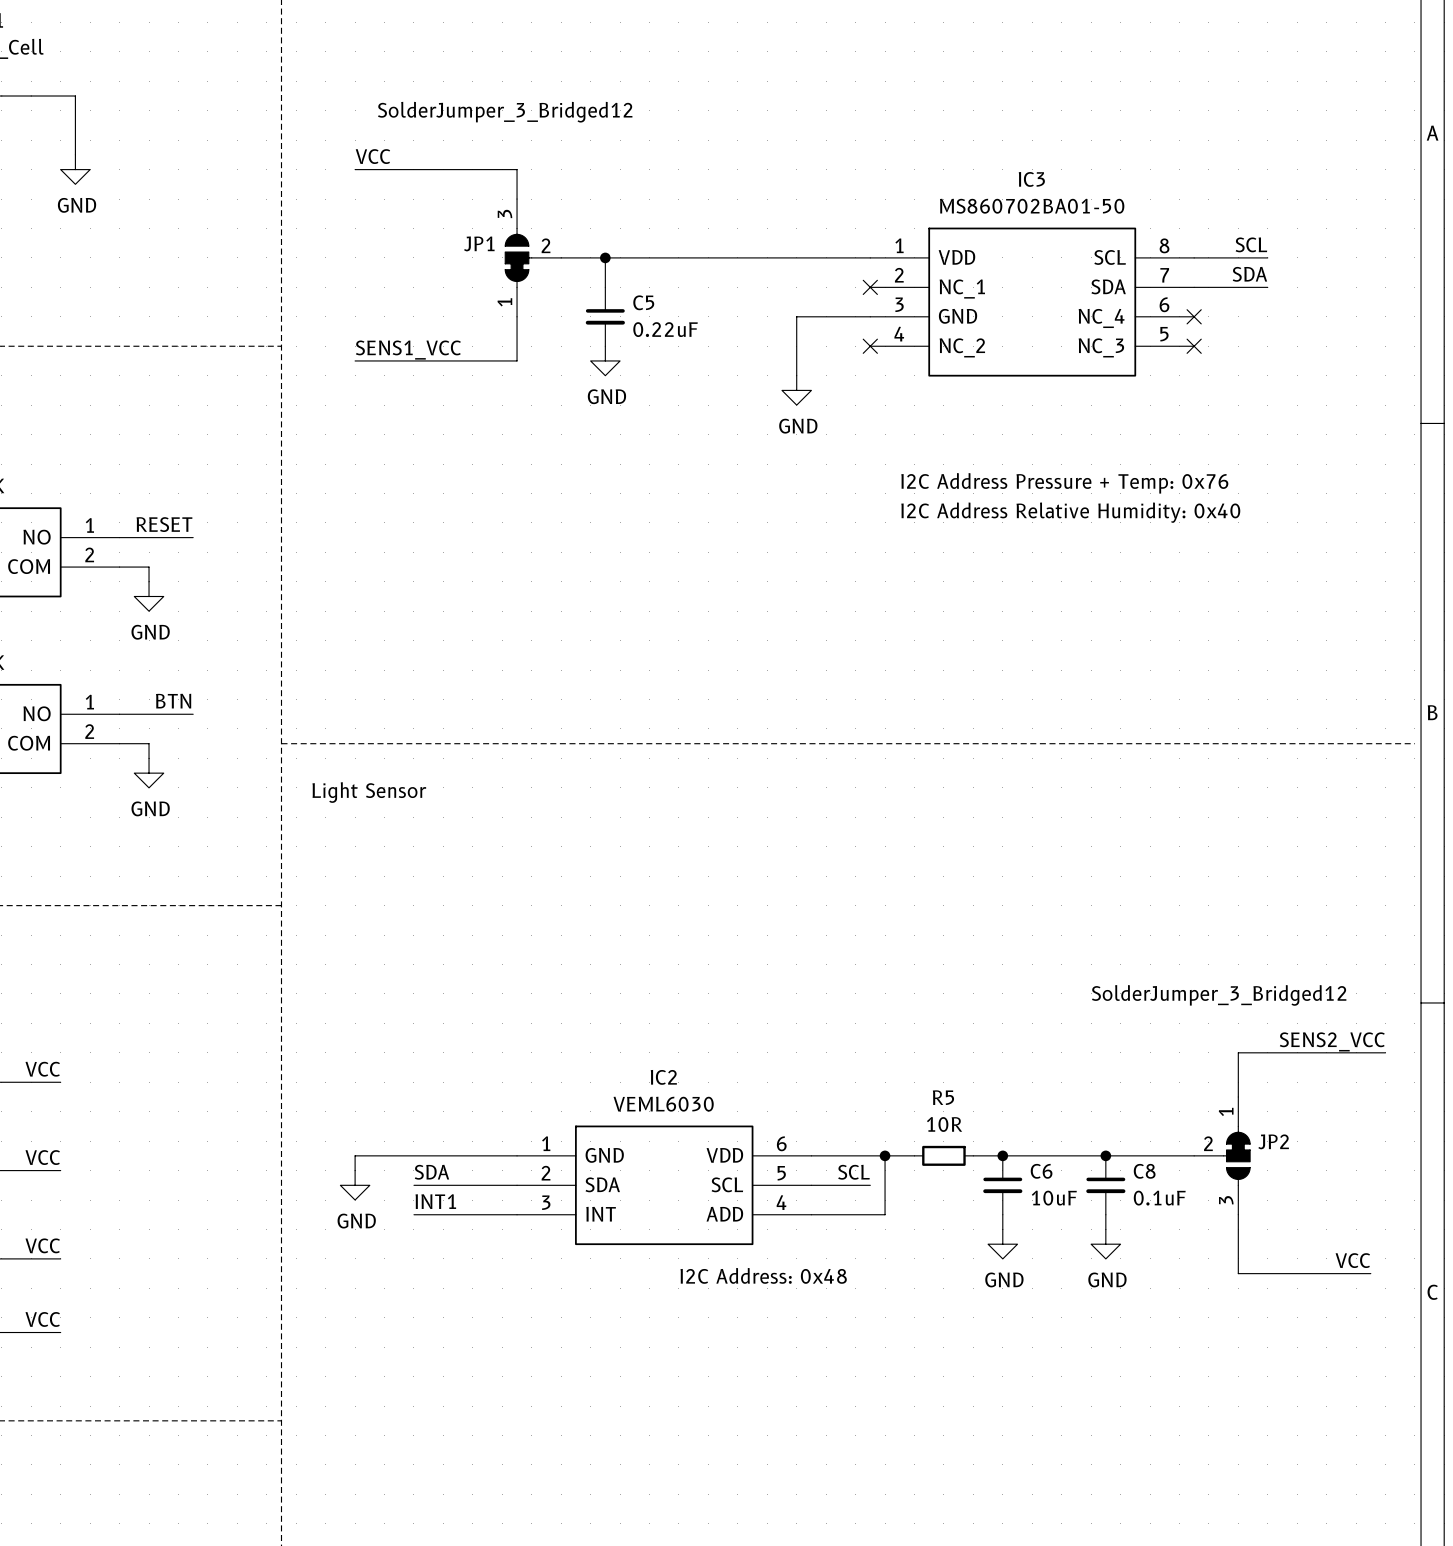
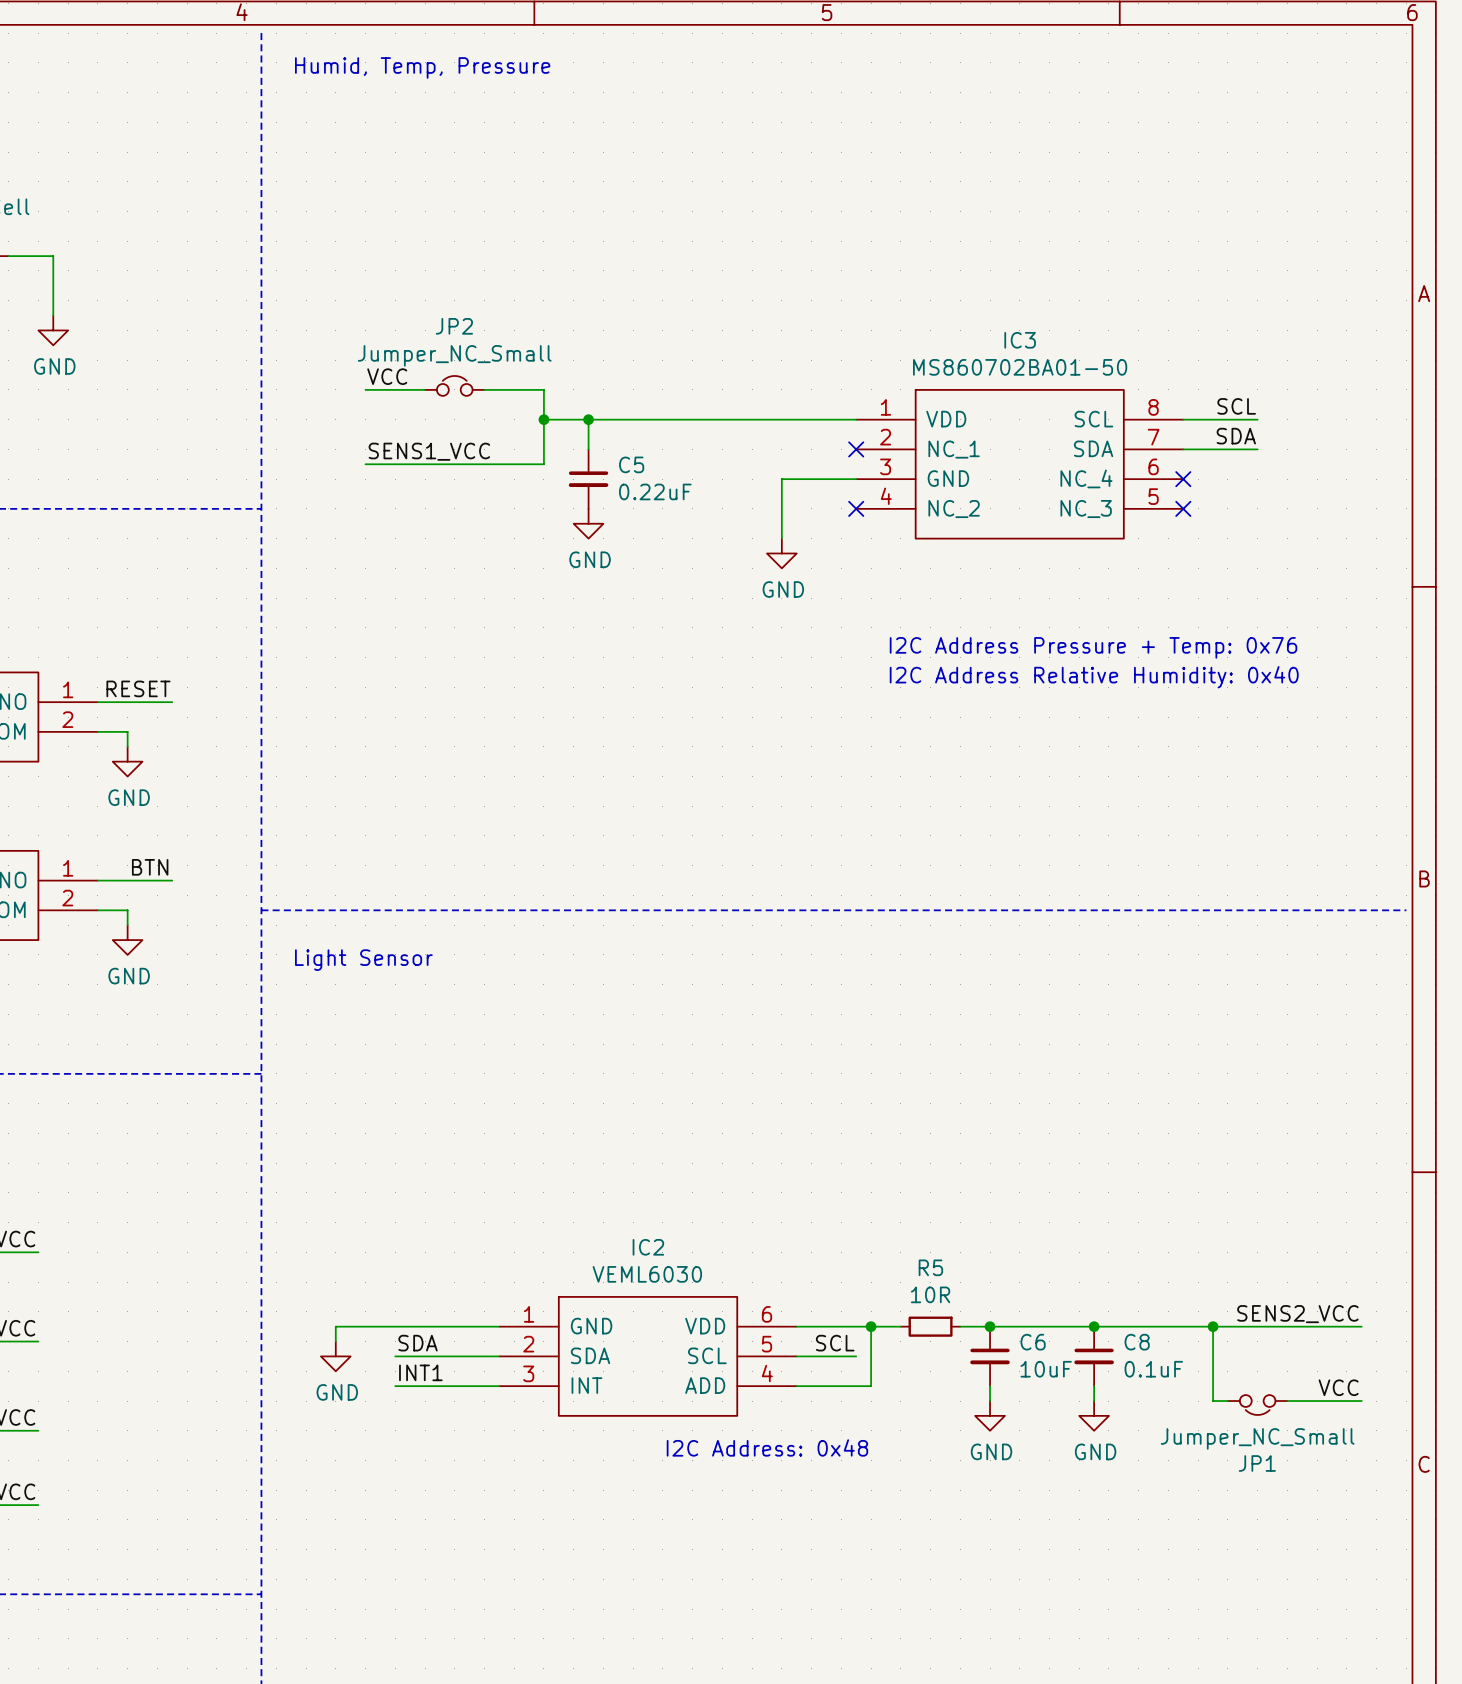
JP1 value: SolderJumper_3_Bridged12 (505, 112) -> Jumper_NC_Small (1257, 1438)
label position: VCC (372, 156) -> VCC (387, 376)
wire: (355, 169) (517, 169) (517, 199) -> none
JP1 symbol: [505, 199, 562, 317] -> [1227, 1395, 1288, 1415]
wire: none -> (365, 389) (425, 389)
wire: none -> (484, 389) (543, 389) (543, 464) (365, 464)
JP1 name position: JP1 (479, 243) -> JP1 (1257, 1463)
junction: none -> (543, 419)
wire: (517, 316) (517, 360) (355, 360) -> none
label position: SENS1_VCC (408, 350) -> SENS1_VCC (429, 451)
JP2 value: SolderJumper_3_Bridged12 (1219, 995) -> Jumper_NC_Small (454, 355)
label position: SENS2_VCC (1332, 1041) -> SENS2_VCC (1297, 1314)
wire: (1385, 1052) (1238, 1052) (1238, 1096) -> none
JP2 symbol: [1194, 1096, 1251, 1215] -> [425, 375, 485, 396]
JP2 name position: JP2 (1273, 1141) -> JP2 (454, 326)
wire: none -> (1183, 1326) (1361, 1326)
wire: none -> (1213, 1326) (1213, 1401) (1227, 1401)
junction: none -> (1213, 1326)
wire: (1238, 1214) (1238, 1273) (1370, 1273) -> none
wire: none -> (1287, 1401) (1361, 1401)
label position: VCC (1352, 1260) -> VCC (1338, 1387)

